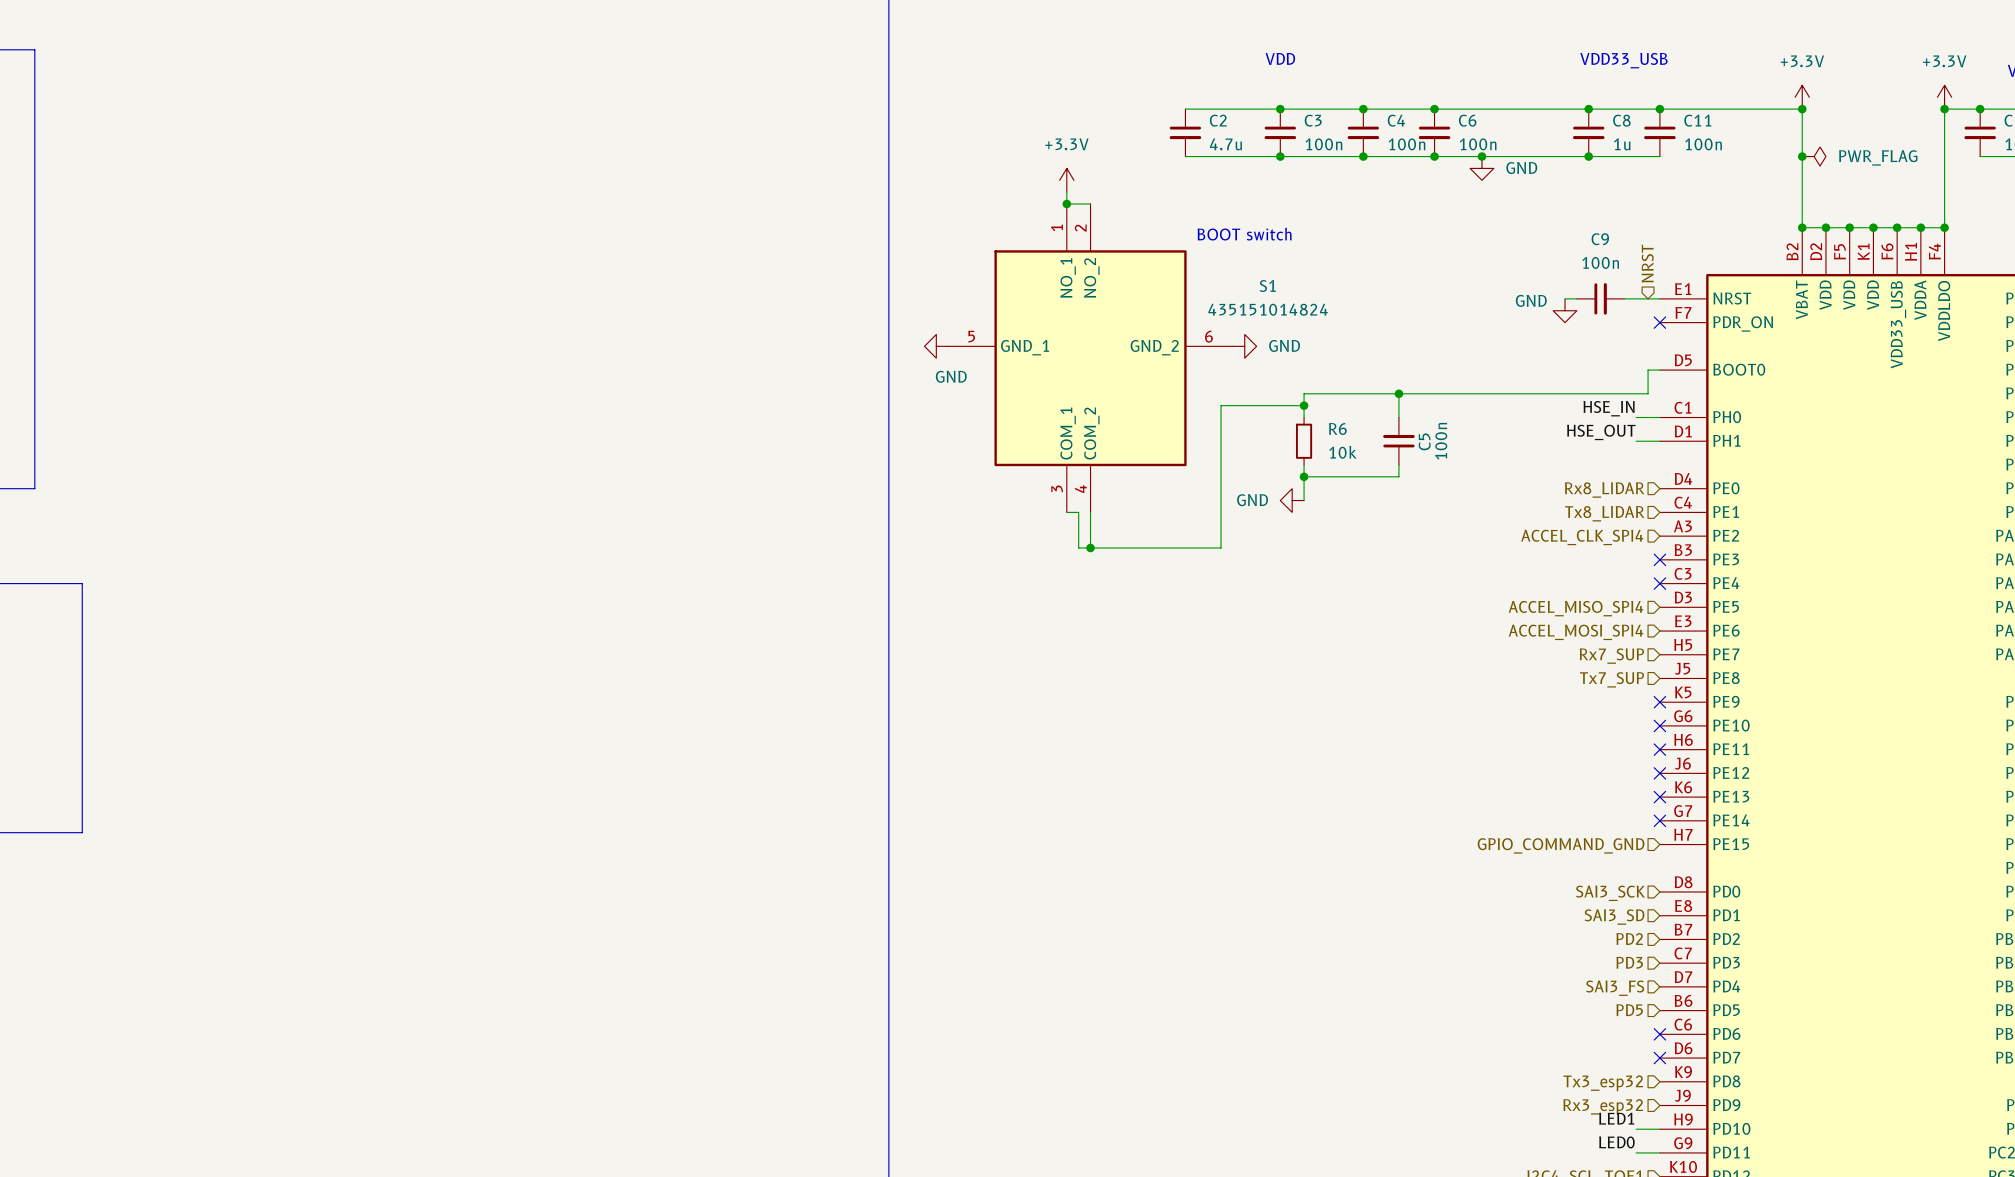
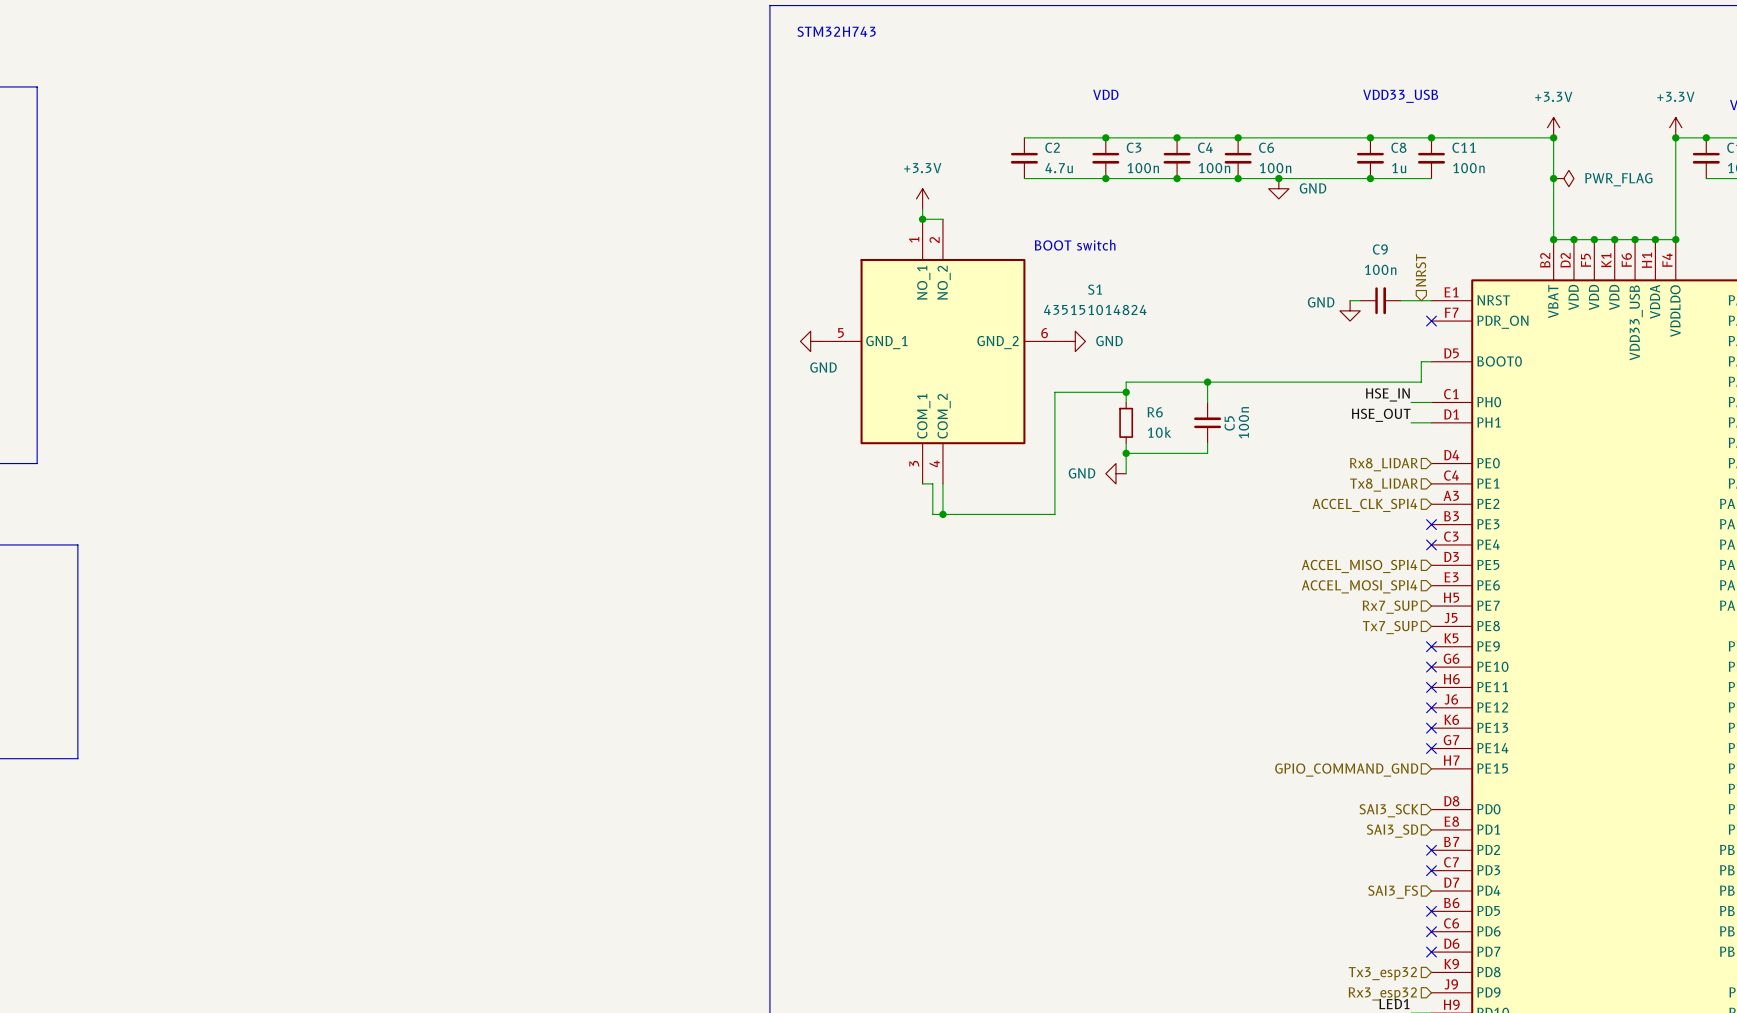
hierarchical label: PD2 (1629, 939) -> none
no-connect mark: none -> (1431, 850)
hierarchical label: PD3 (1629, 962) -> none
no-connect mark: none -> (1431, 870)
hierarchical label: PD5 (1629, 1010) -> none
no-connect mark: none -> (1431, 911)

